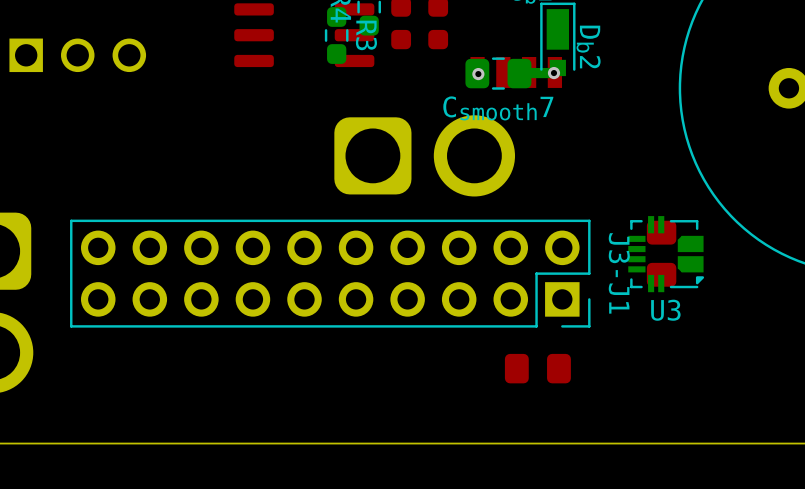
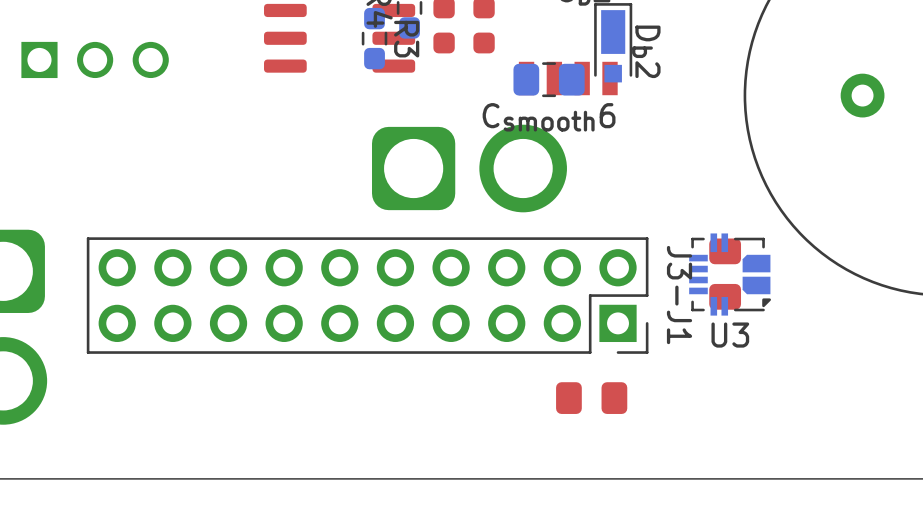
bottom track: (553, 73) (519, 73) -> none
via: (553, 73) -> none
via: (478, 74) -> none
Csmooth7 name: Csmooth7 (498, 108) -> Csmooth6 (549, 117)

